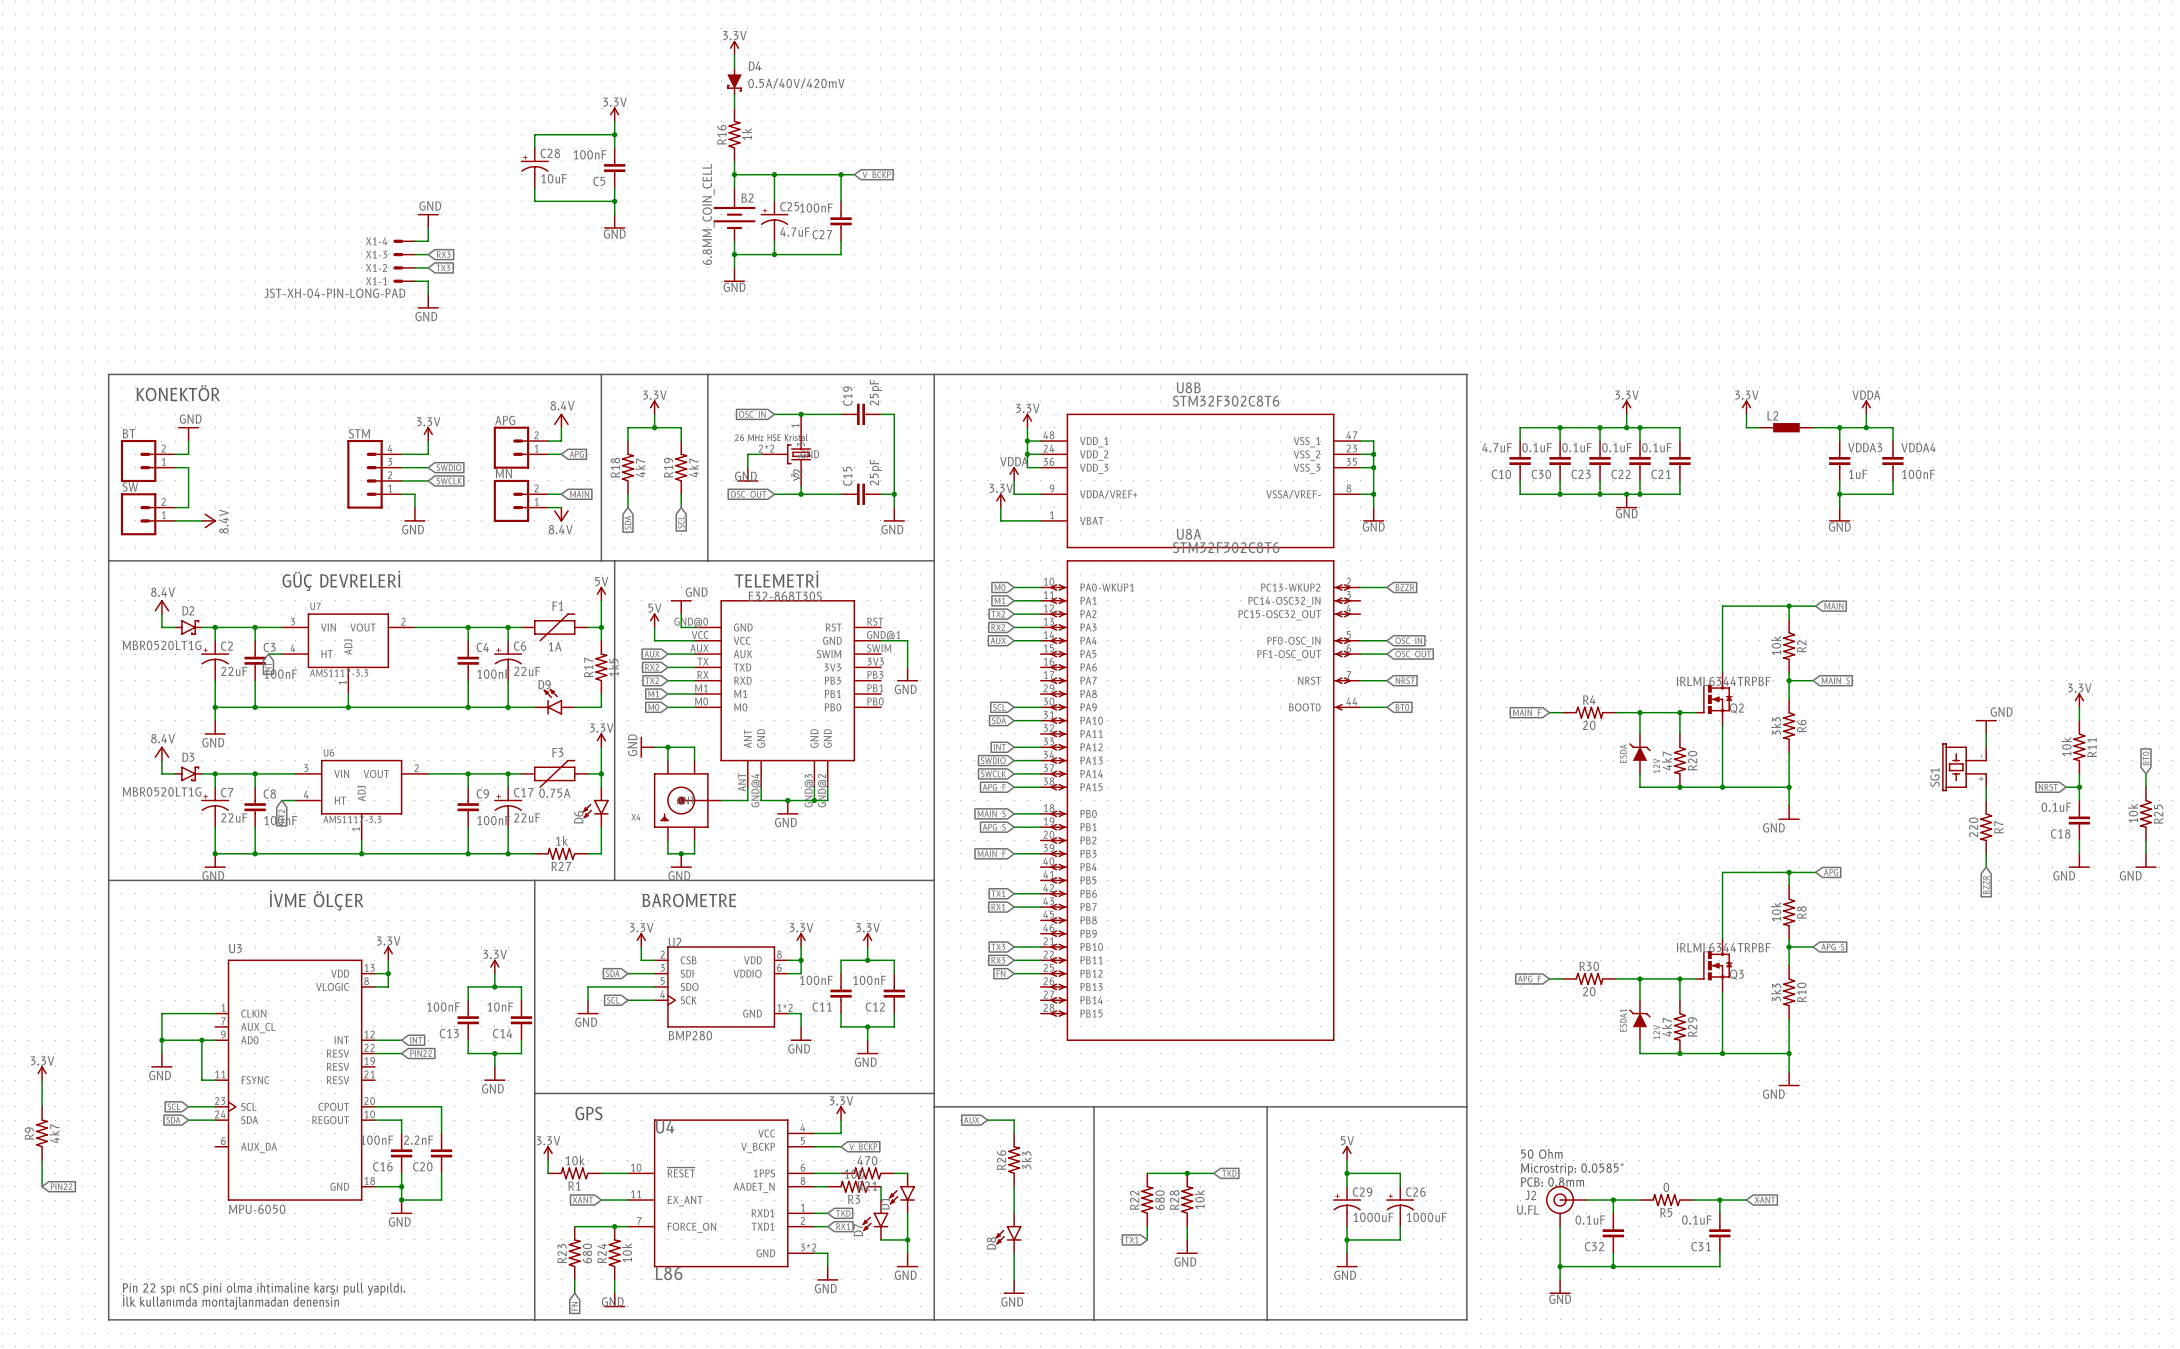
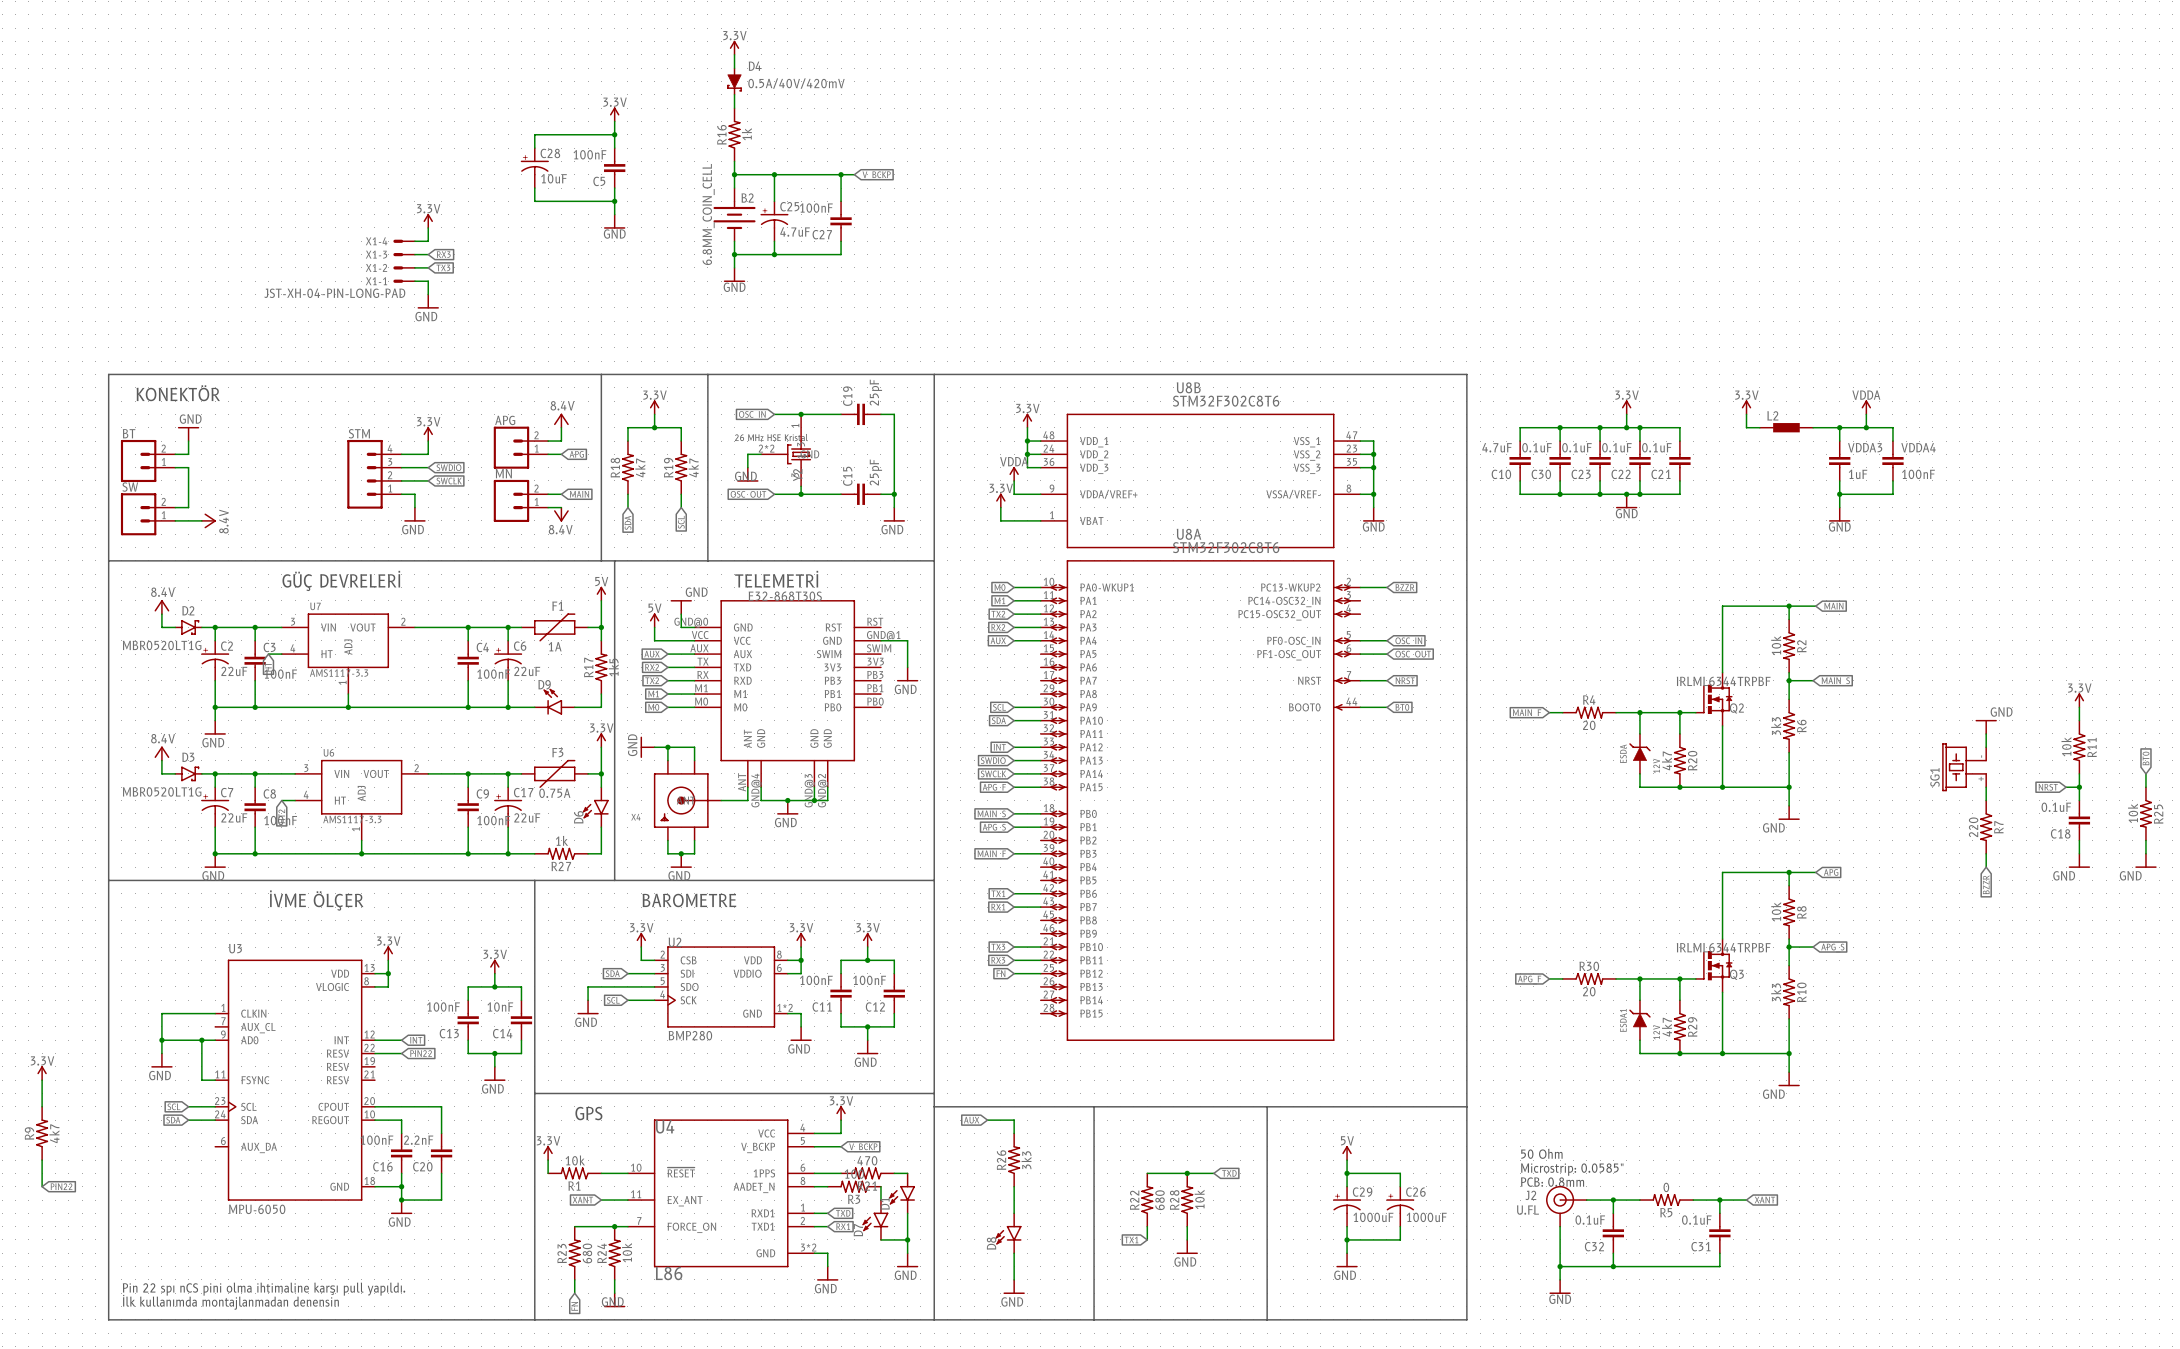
power symbol: GND (428, 220) -> 3.3V (428, 220)

